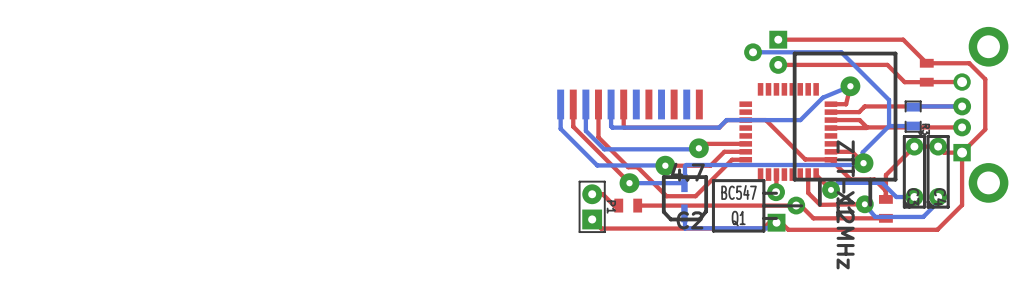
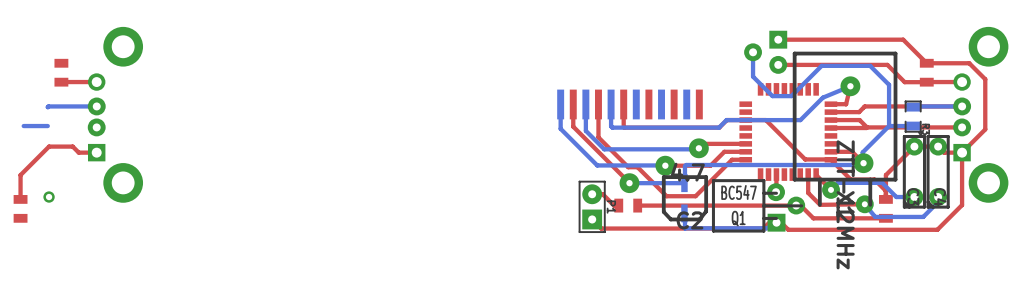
bottom track: (753, 52) (841, 52) (889, 100) -> (753, 52) (753, 76) (772, 96) (791, 96) (821, 65) (870, 65) (889, 84) (889, 100)
part: none -> (61, 72)
top track: none -> (96, 82) (61, 82)
bottom track: none -> (96, 106) (47, 107)
part: none -> (115, 114)
bottom track: none -> (47, 126) (23, 126)
top track: none -> (96, 152) (78, 152) (72, 146) (49, 146) (20, 175) (20, 199)
via: none -> (49, 197)
part: none -> (20, 208)

